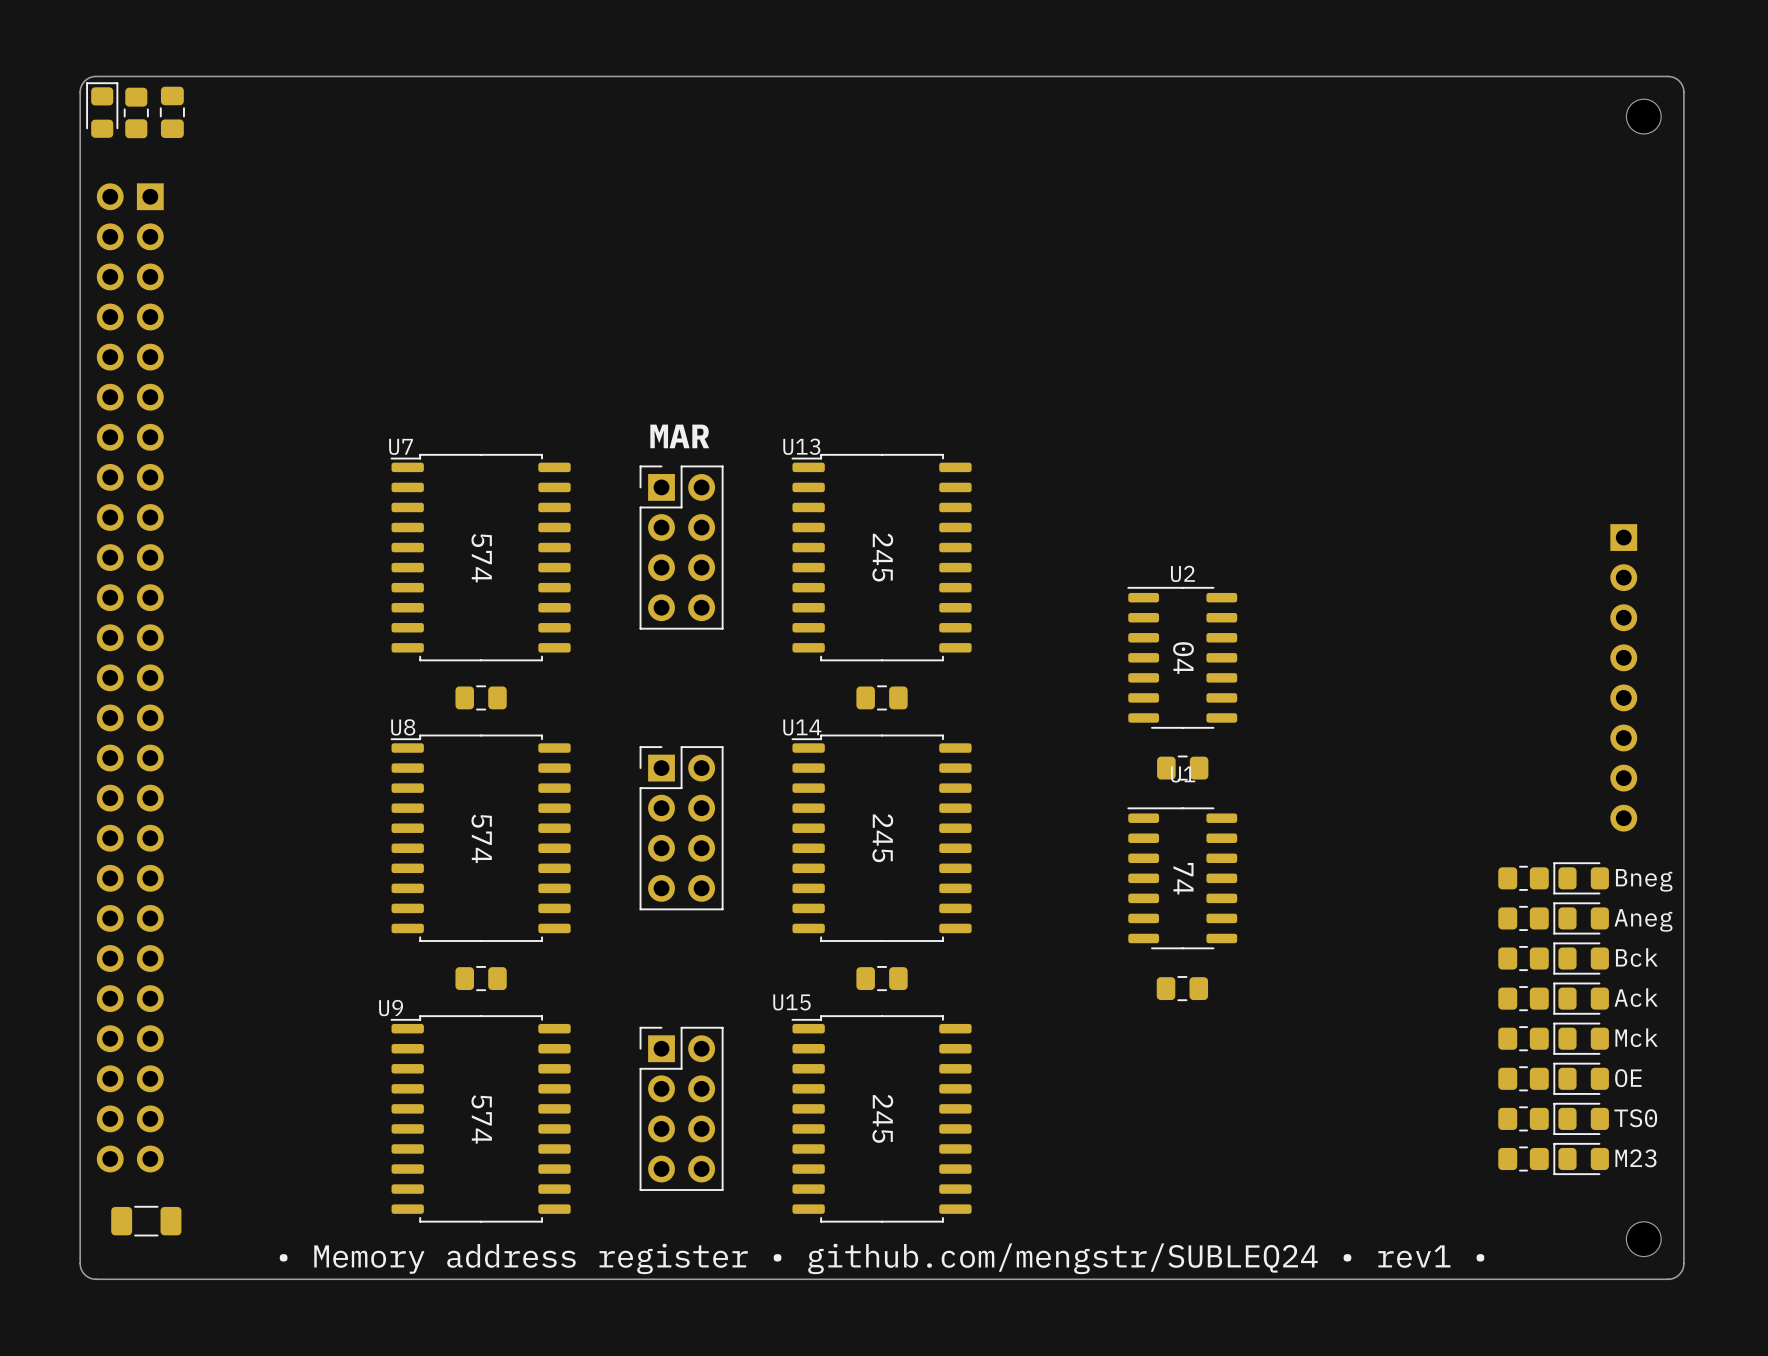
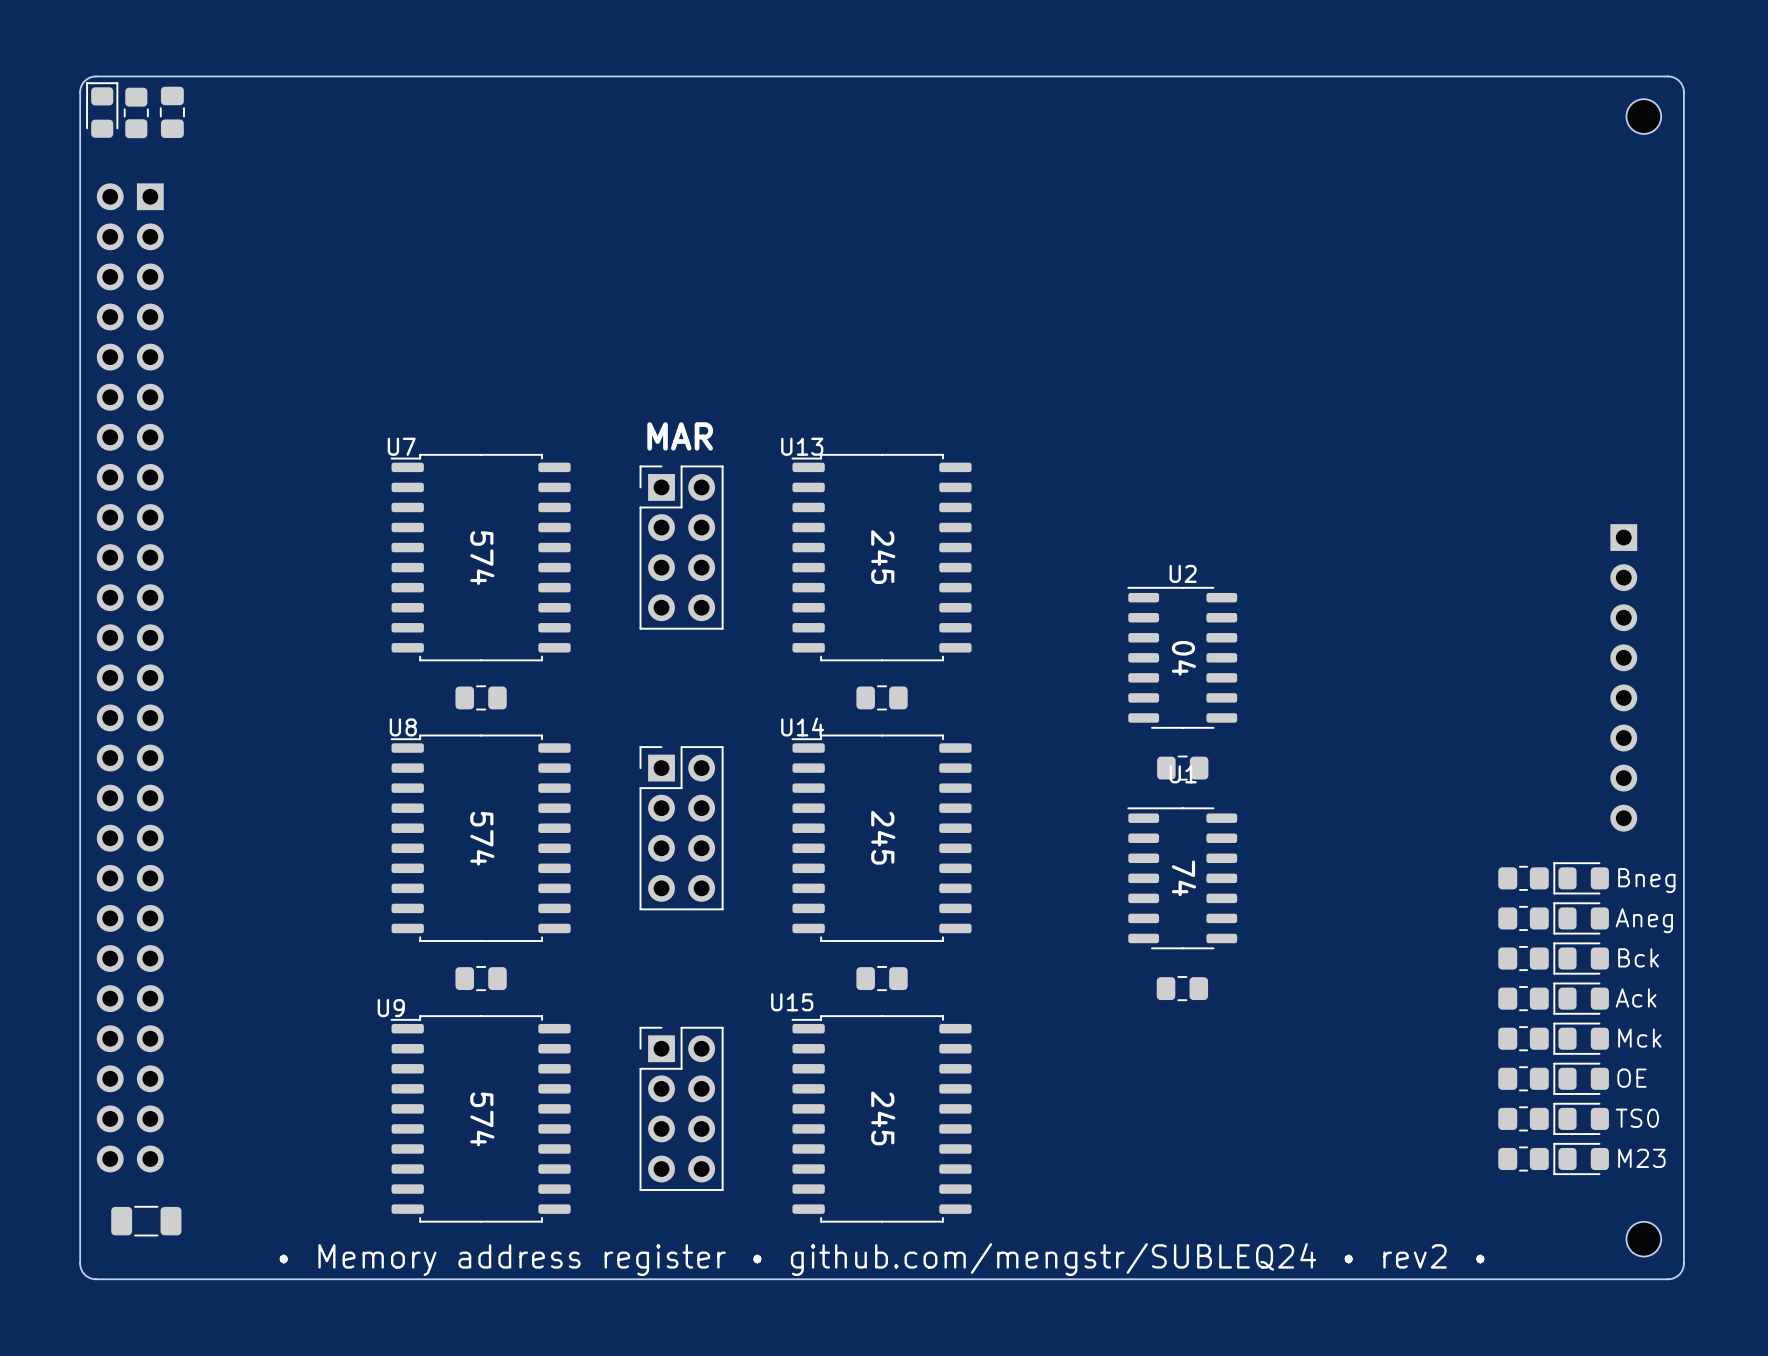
text: • Memory address register • github.com/mengstr/SUBLEQ24 • rev1 • (882, 1258) -> • Memory address register • github.com/mengstr/SUBLEQ24 • rev2 • (882, 1259)

